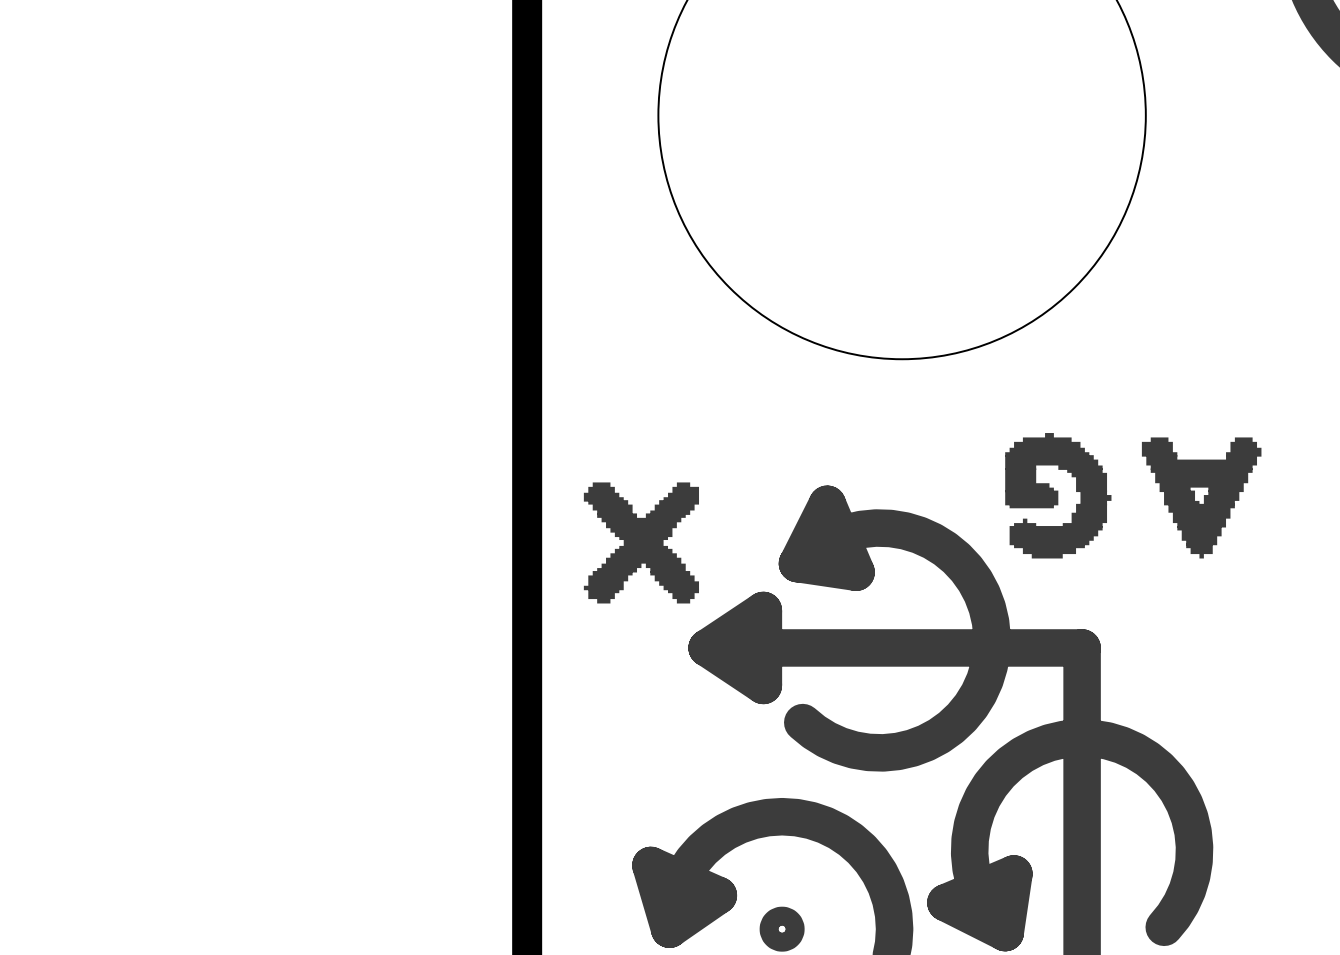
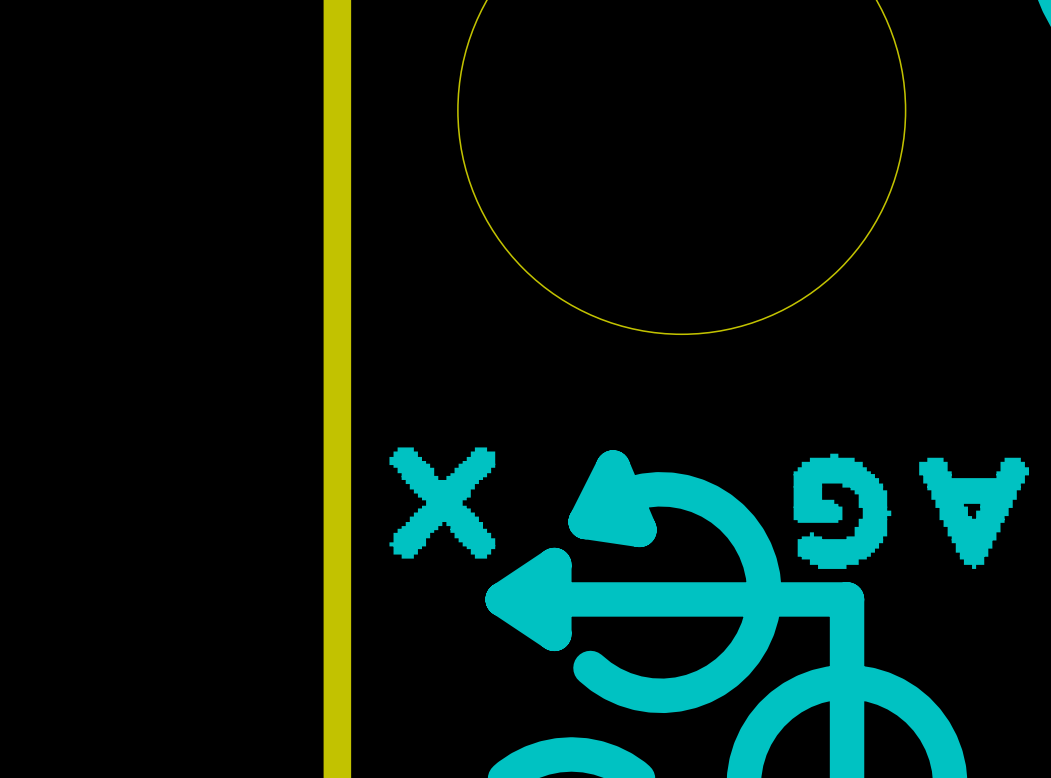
drawing position: (1058, 495) -> (842, 511)
drawing position: (1201, 497) -> (974, 513)

